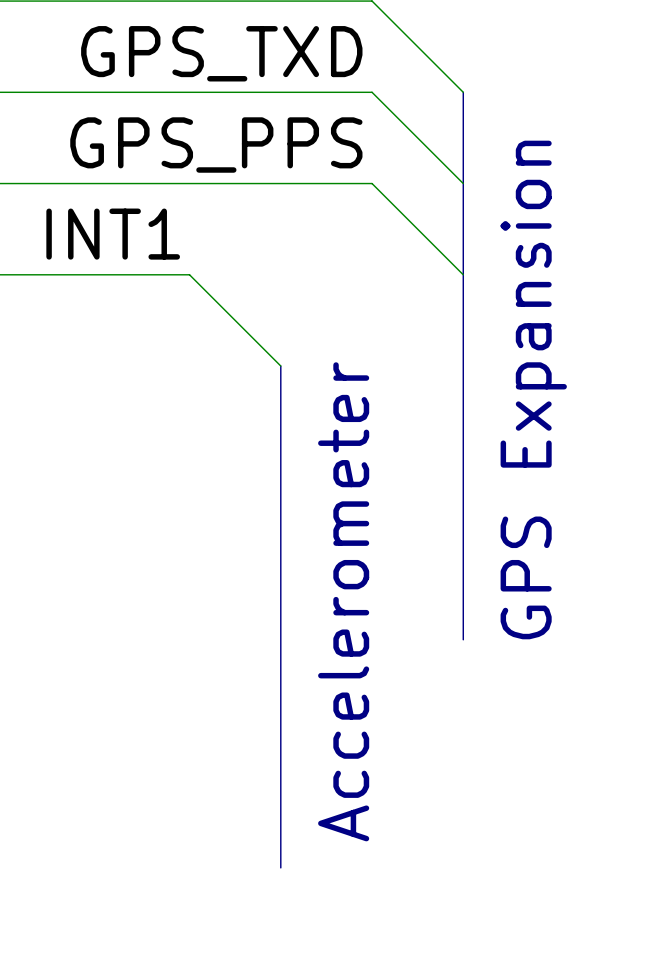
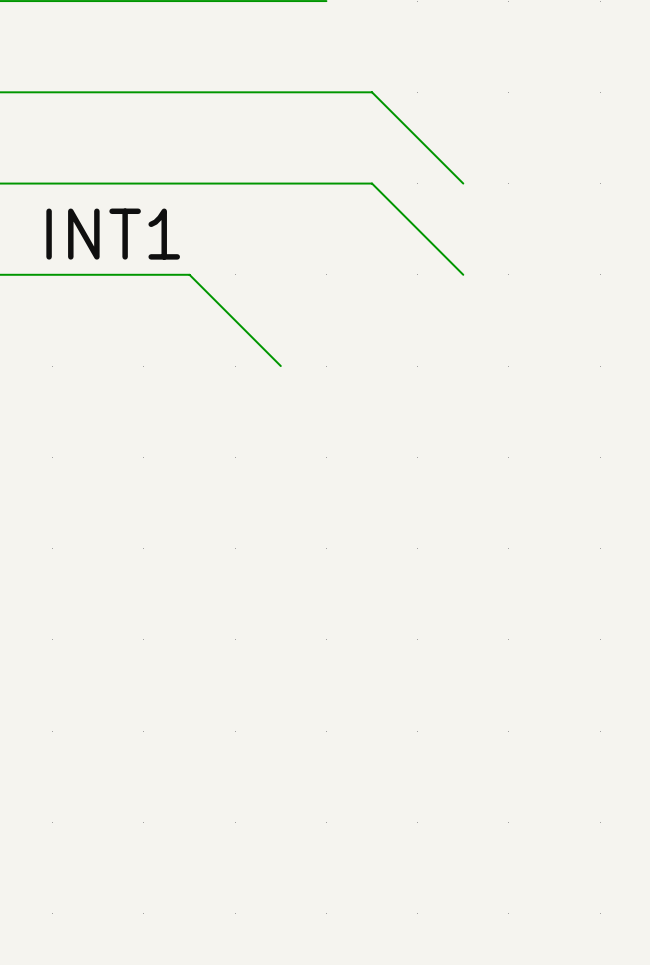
wire: (326, 1) (372, 1) (463, 92) -> none
label: GPS_TXD (221, 53) -> none
bus: (463, 92) (463, 639) -> none
label: GPS_PPS (216, 145) -> none
bus: (280, 366) (280, 867) -> none
text: GPS Expansion (533, 389) -> none
text: Accelerometer (343, 601) -> none

